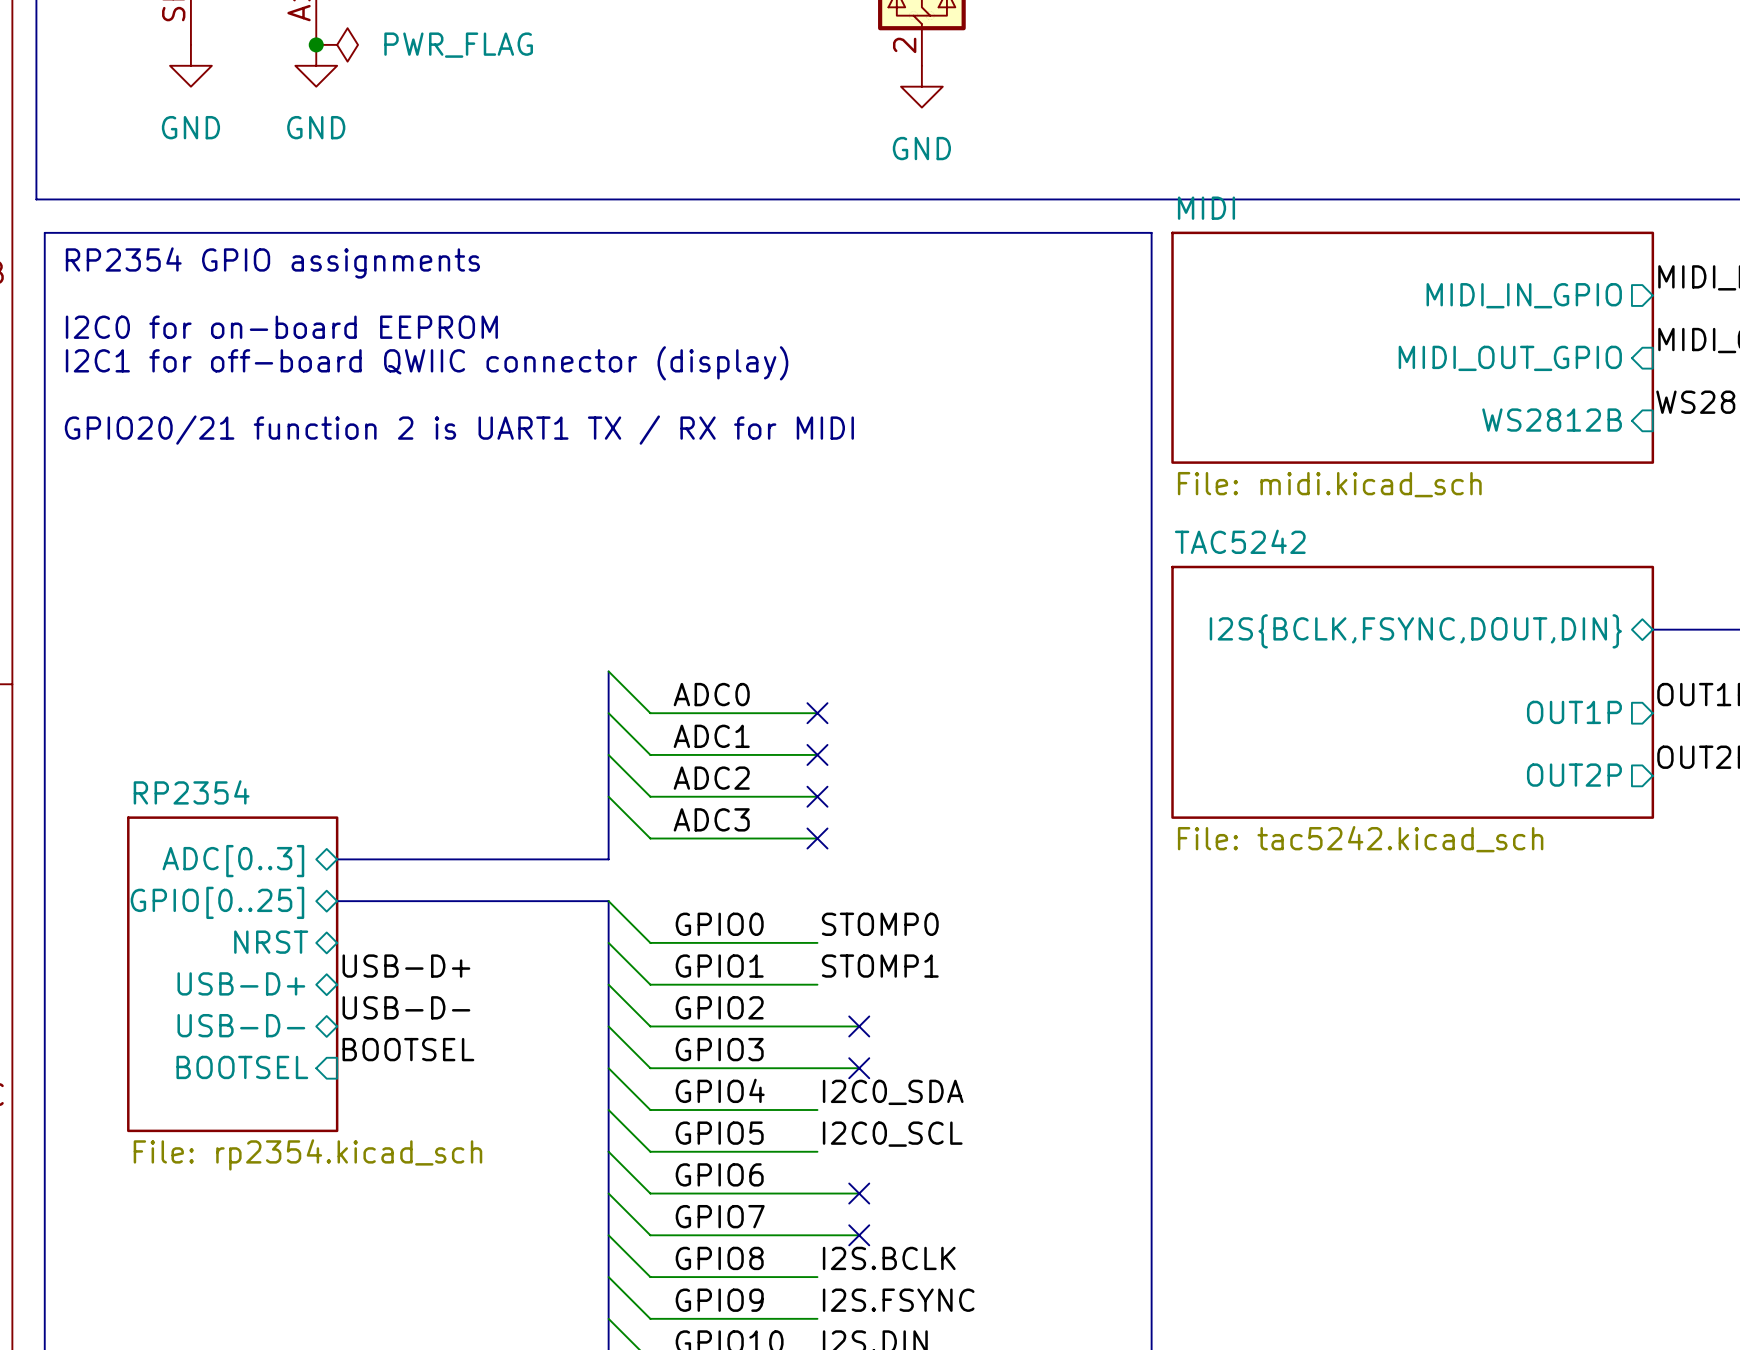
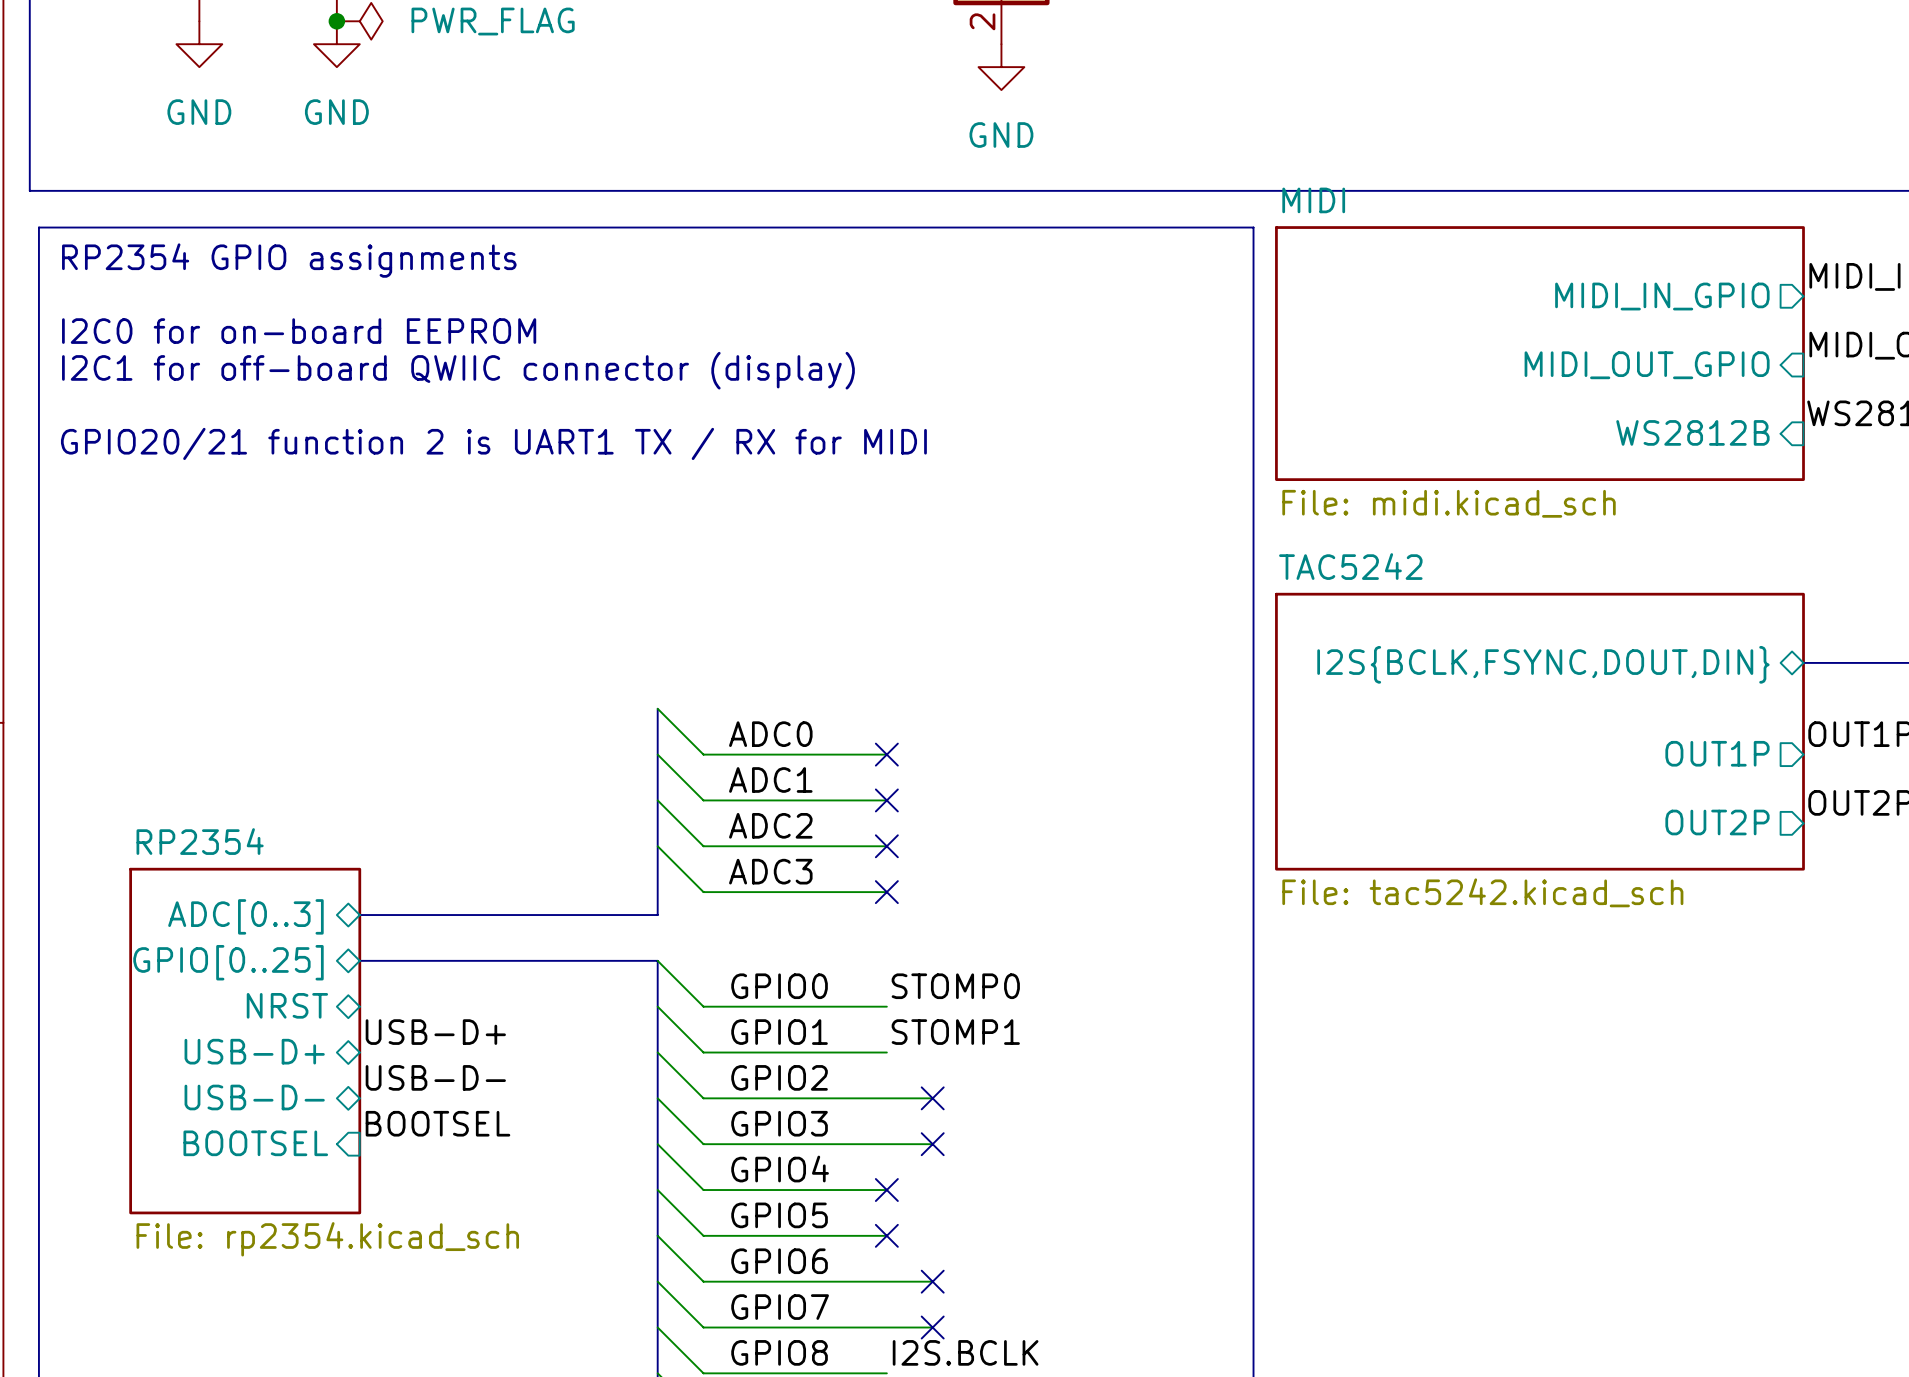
label: I2C0_SDA (893, 1092) -> none
no-connect mark: none -> (886, 1190)
label: I2C0_SCL (892, 1134) -> none
no-connect mark: none -> (886, 1235)

